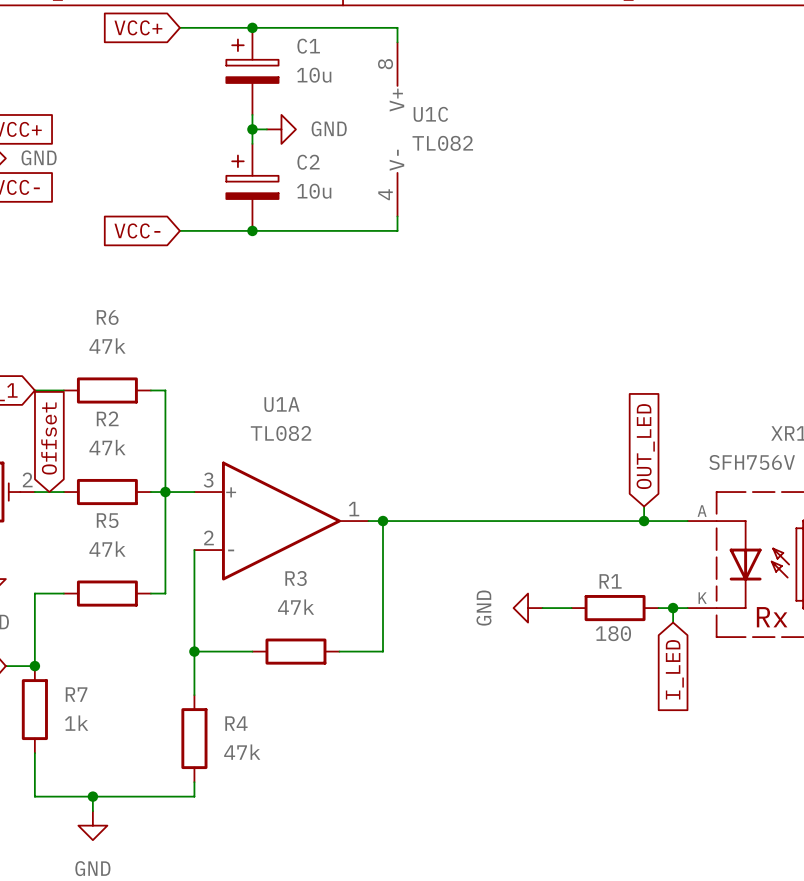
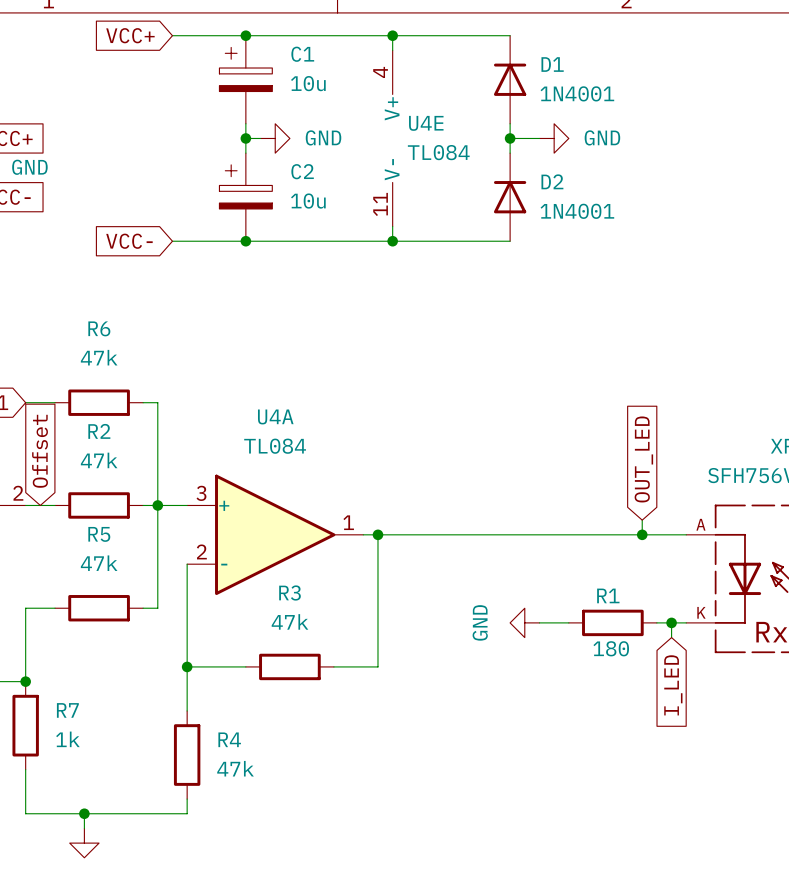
wire: none -> (392, 35) (510, 35)
junction: none -> (392, 35)
U1C pin number: 8 (385, 64) -> 4 (380, 72)
D1: none -> 1N4001 (510, 79)
U1C name: U1C (430, 114) -> U4E (426, 123)
wire: none -> (510, 123) (510, 153)
wire: none -> (510, 138) (539, 138)
junction: none -> (510, 138)
power symbol: none -> GND (554, 138)
U1C value: TL082 (442, 143) -> TL084 (438, 152)
D2: none -> 1N4001 (510, 197)
U1C pin number: 4 (385, 194) -> 11 (380, 204)
wire: none -> (392, 241) (510, 241)
junction: none -> (392, 241)
U1A name: U1A (281, 404) -> U4A (275, 416)
U1A value: TL082 (281, 433) -> TL084 (275, 446)

